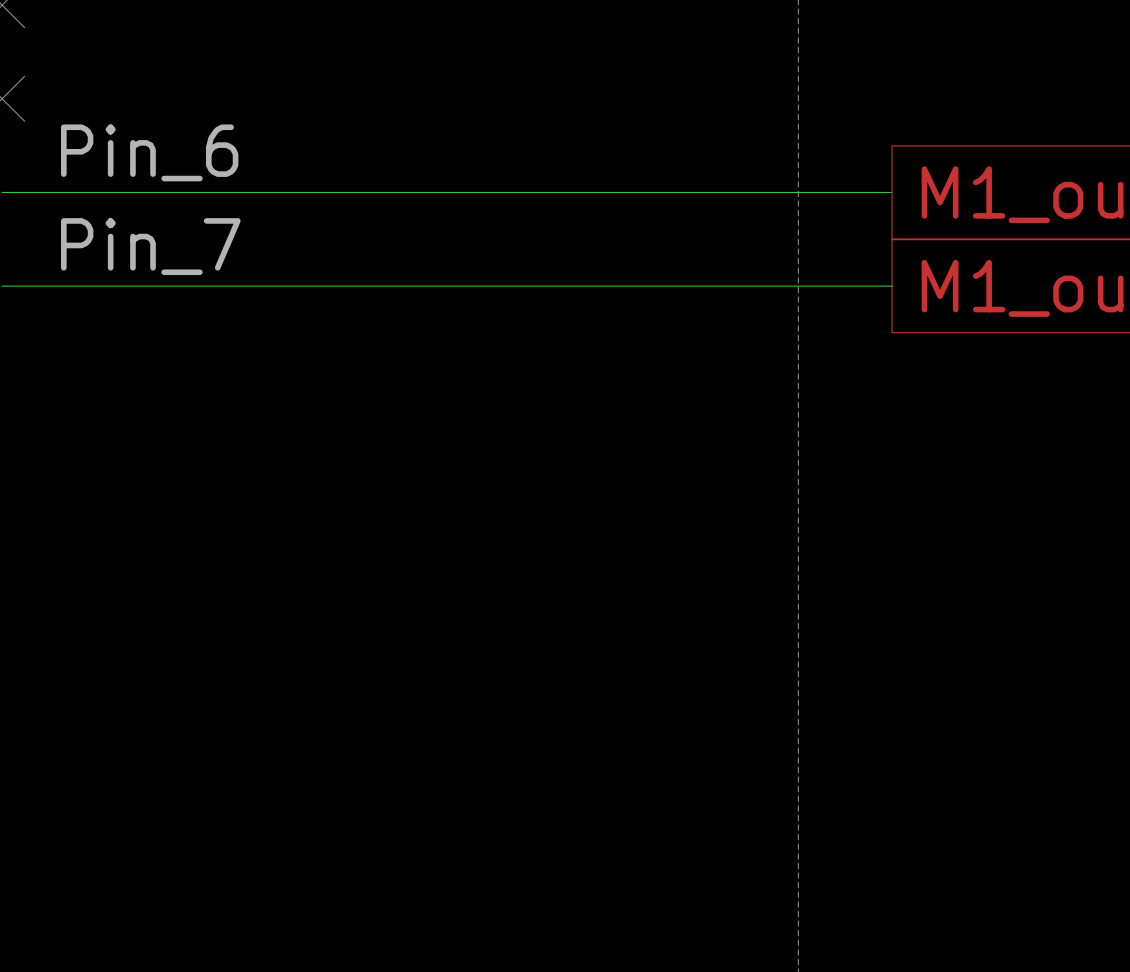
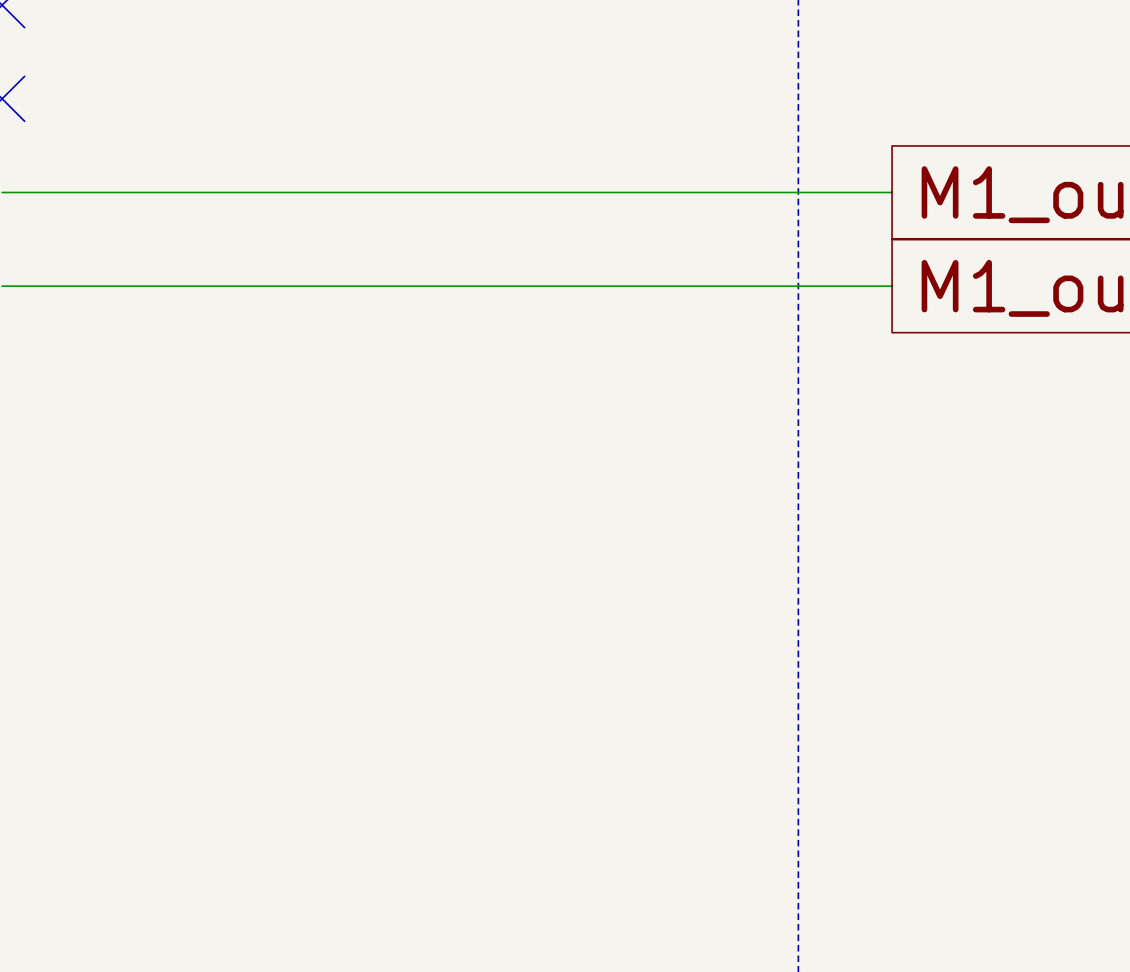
label: Pin_6 (149, 152) -> none
label: Pin_7 (150, 246) -> none

